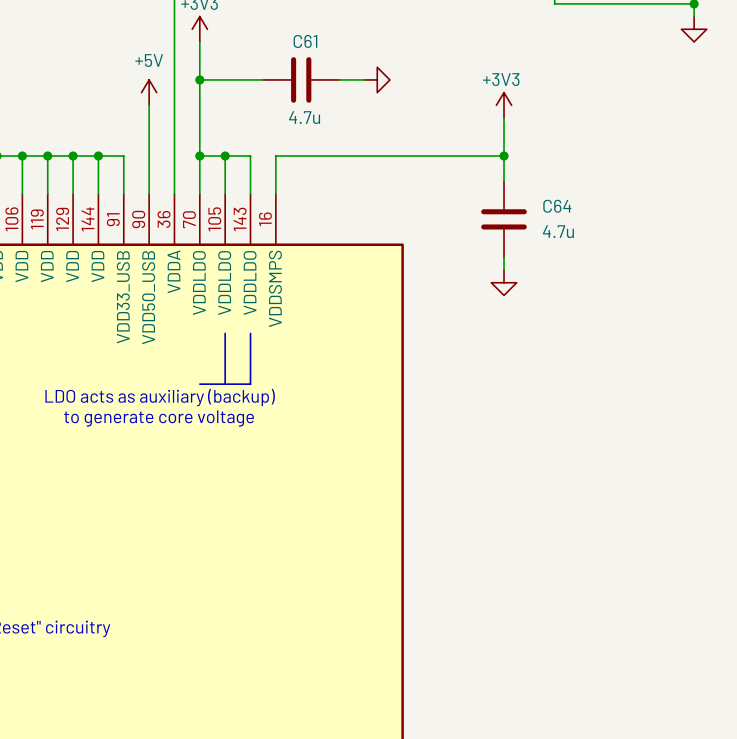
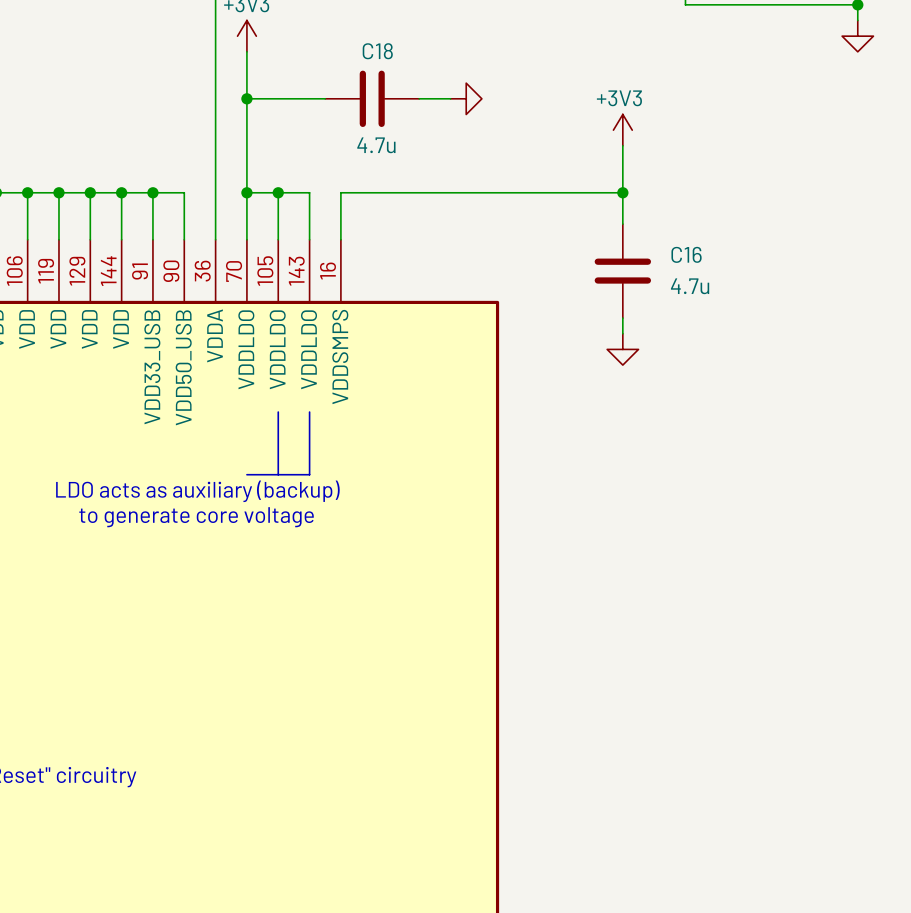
C61 name: C61 (305, 41) -> C18 (377, 51)
power symbol: +5V (149, 92) -> none
wire: (149, 105) (149, 156) -> (152, 192) (184, 192)
junction: none -> (152, 192)
C64 name: C64 (557, 206) -> C16 (686, 254)

